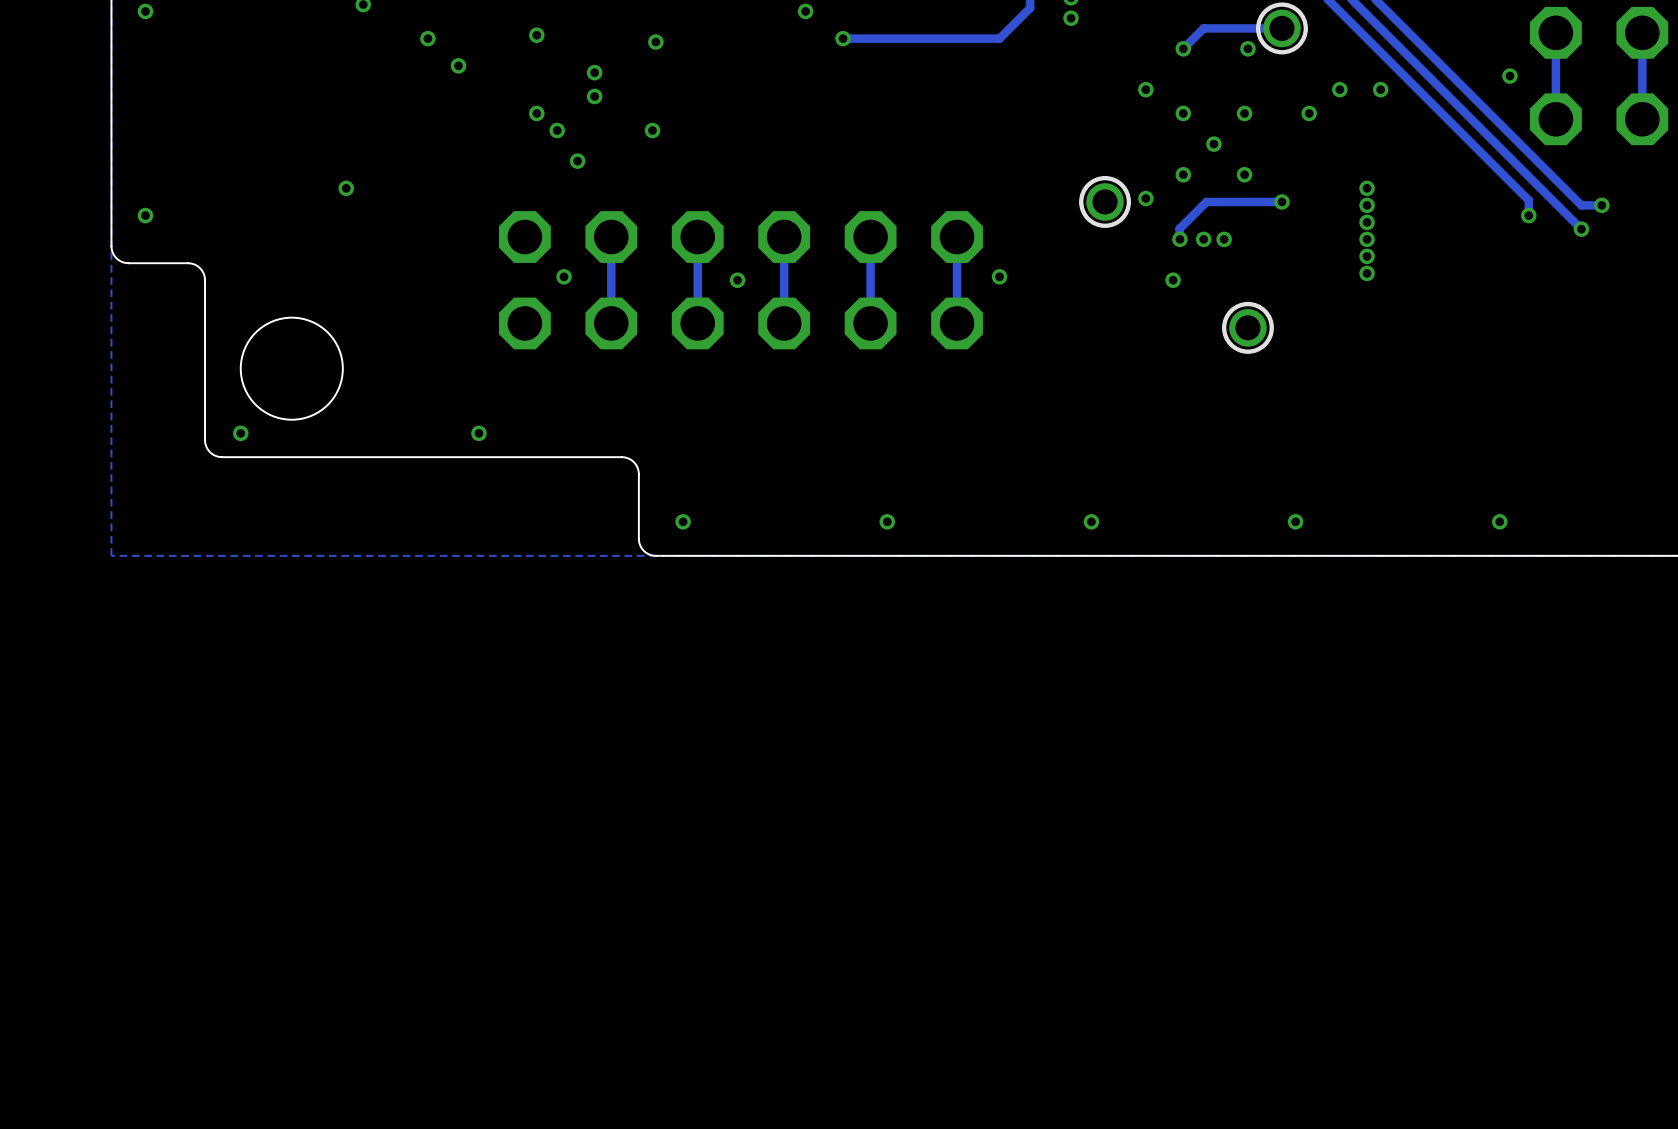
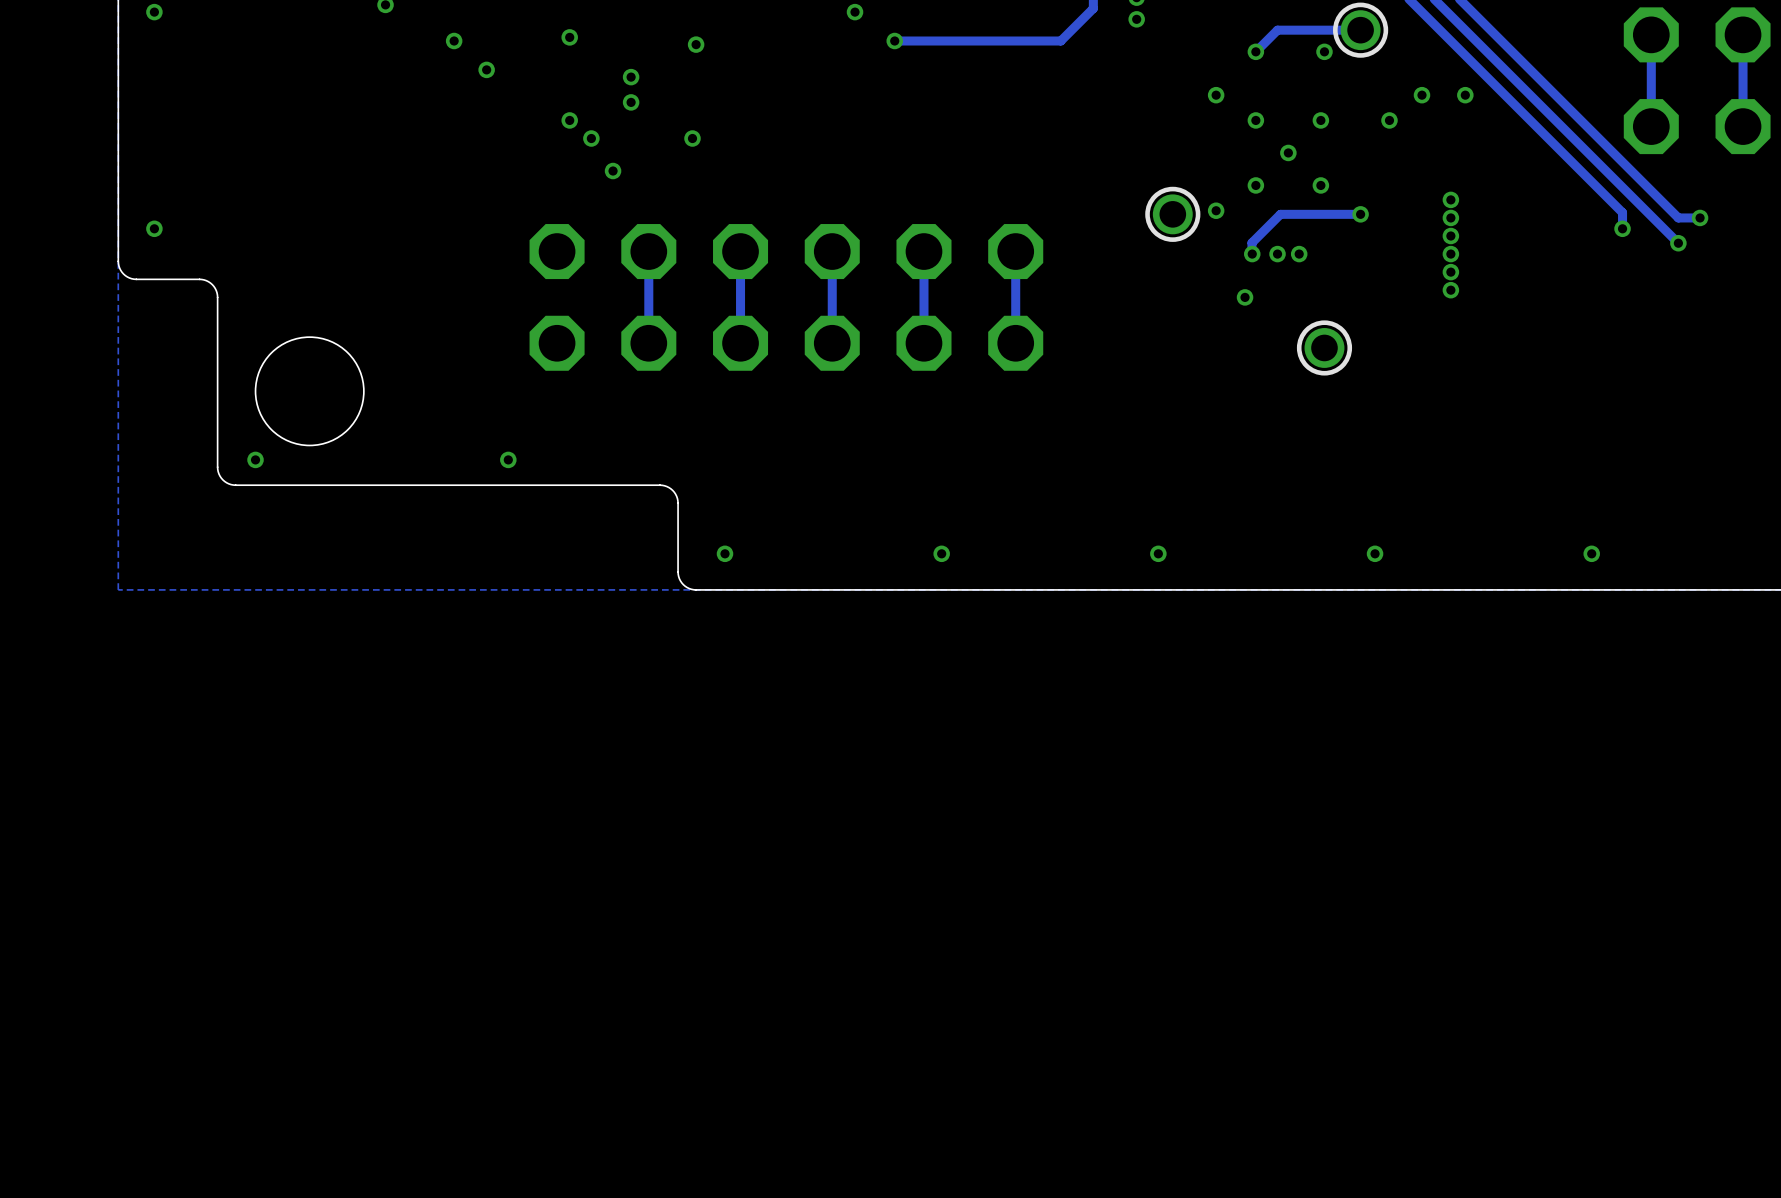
via: (1509, 76) -> none
via: (346, 188) -> none
via: (564, 276) -> none
via: (999, 276) -> none
via: (737, 280) -> none

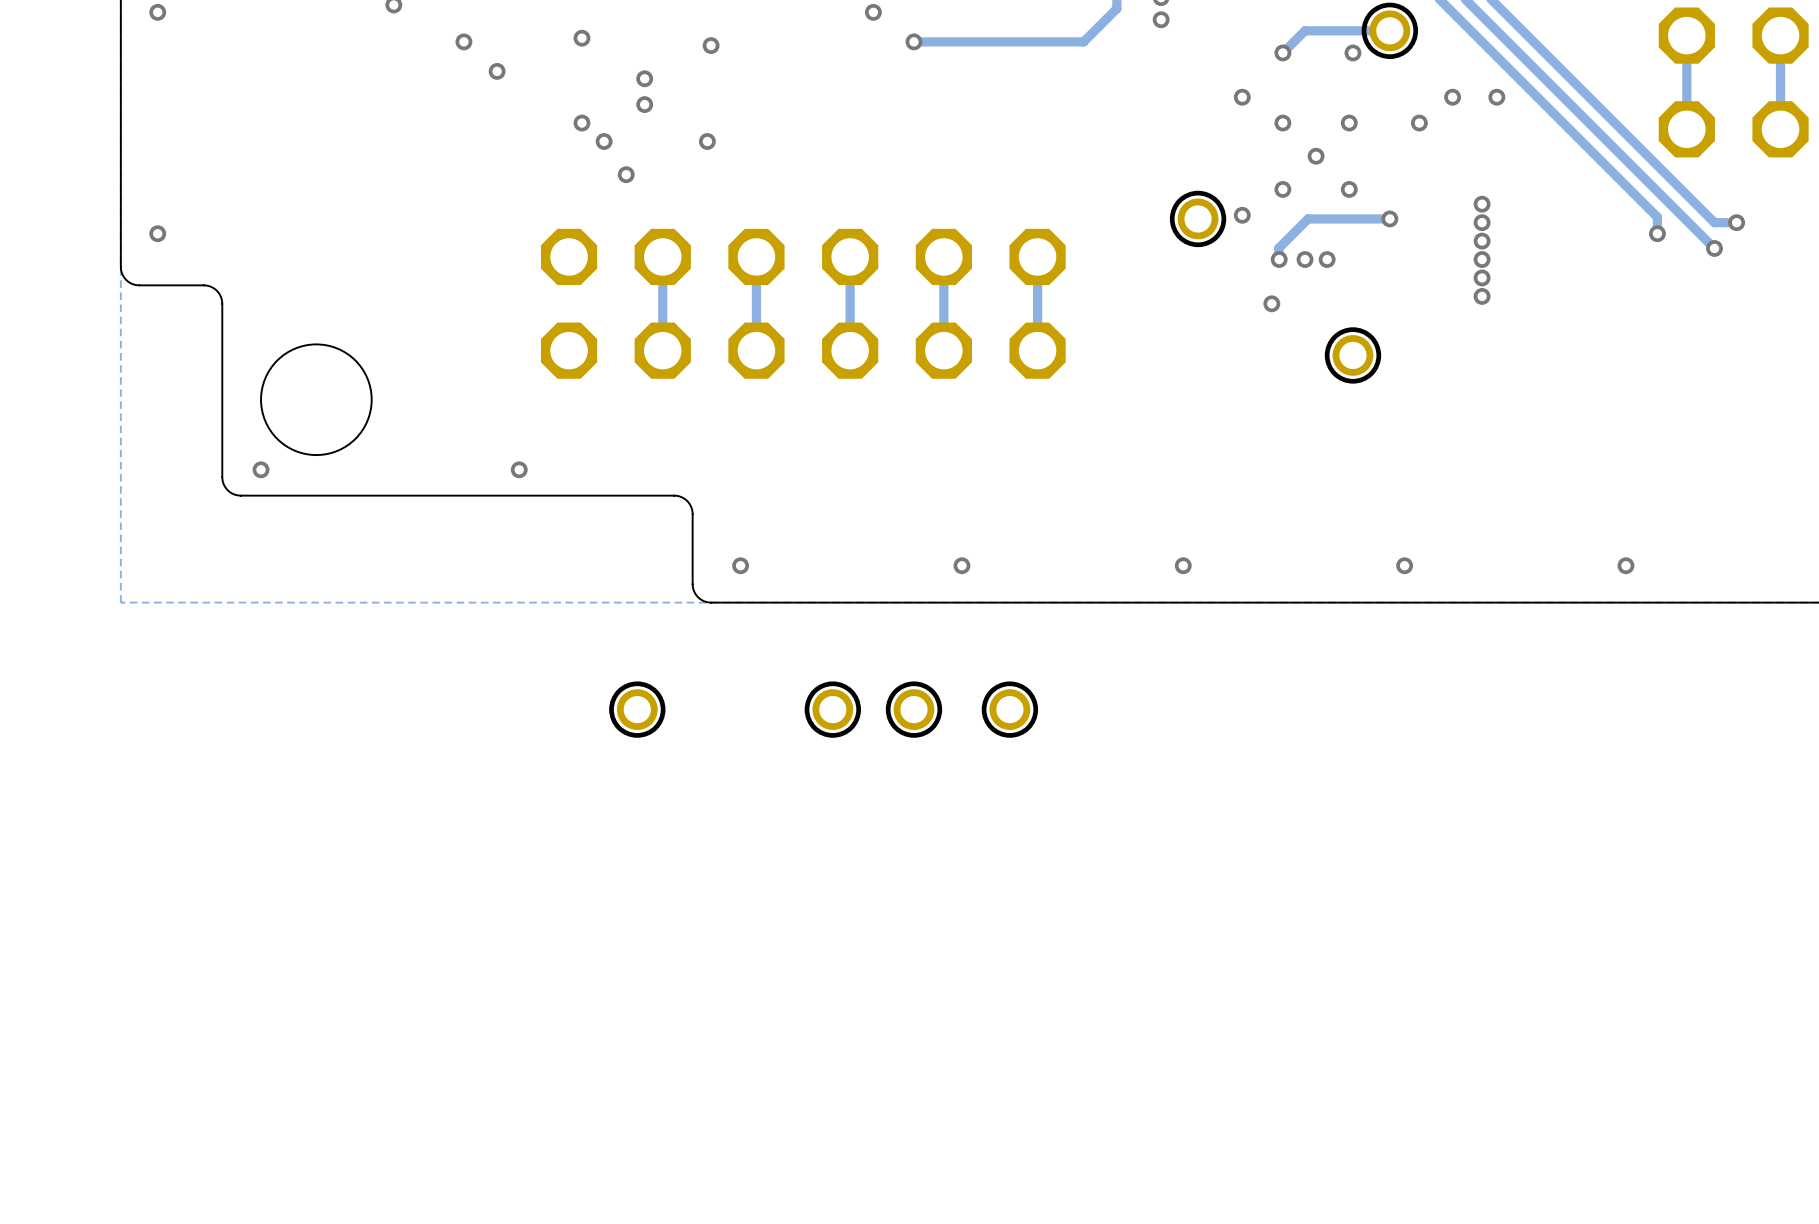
part: none -> (637, 709)
part: none -> (832, 709)
part: none -> (913, 709)
part: none -> (1009, 709)

